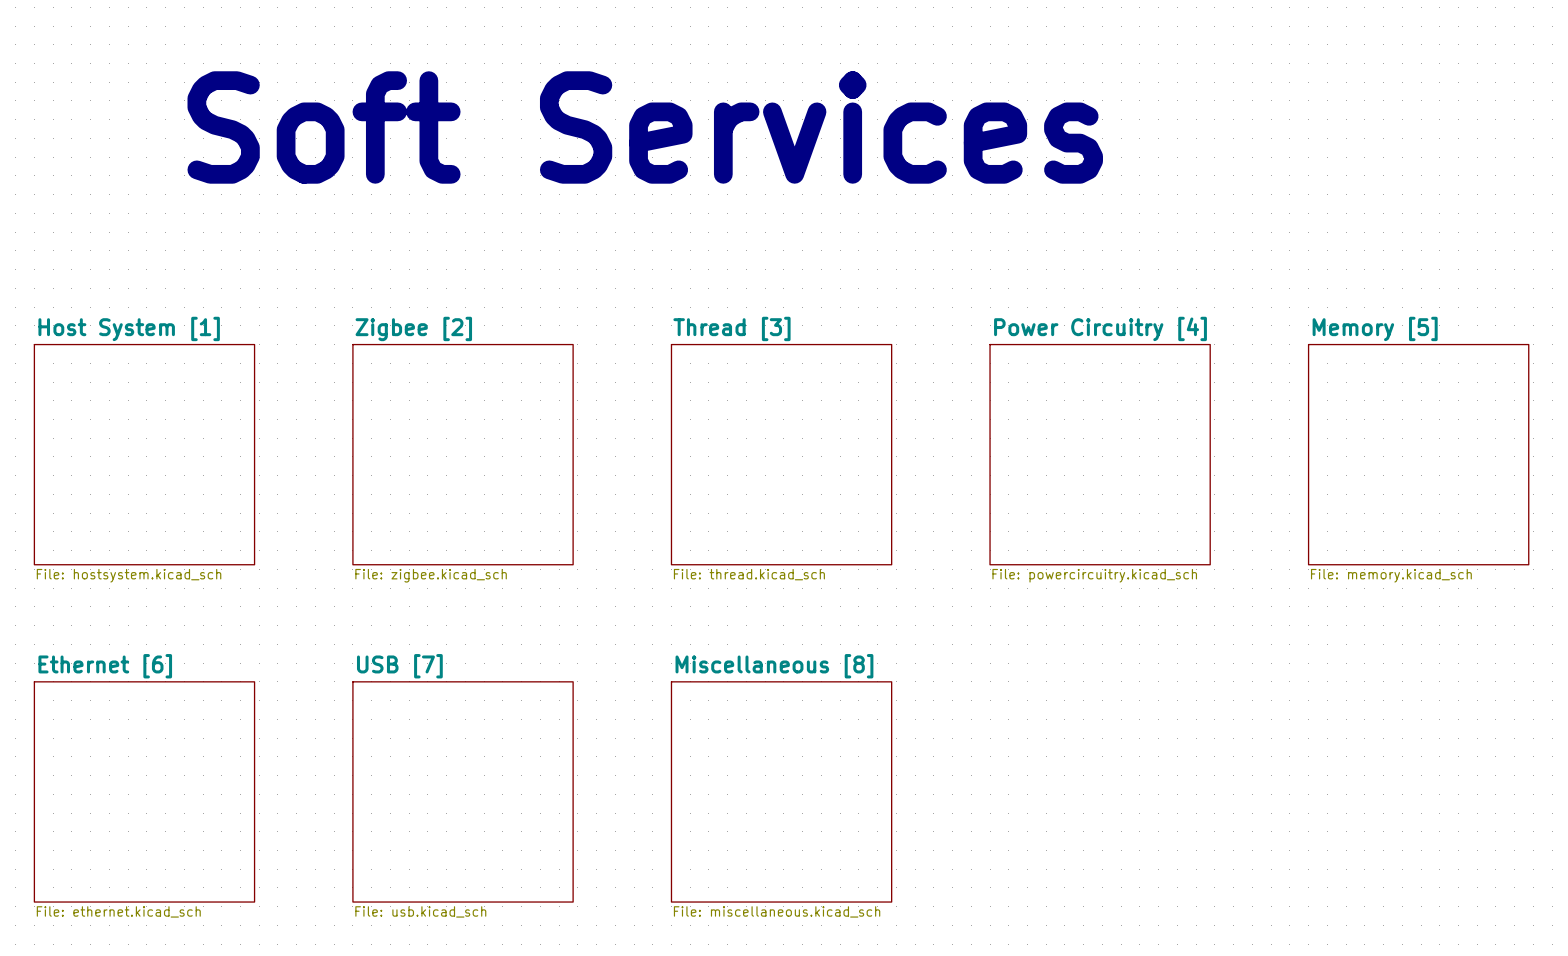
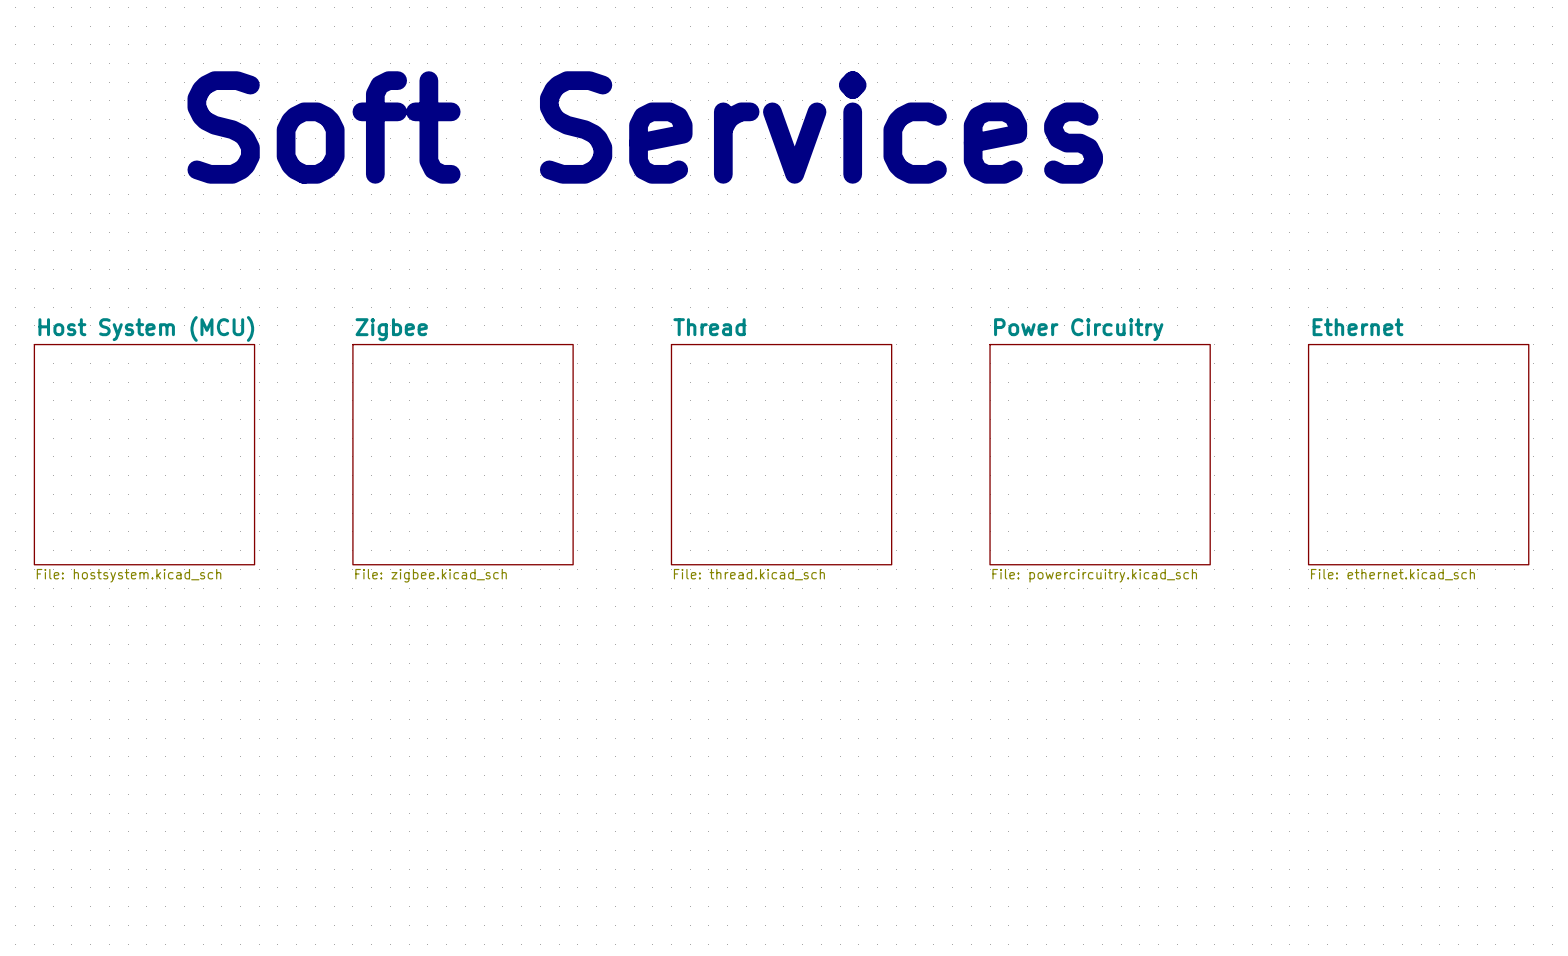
sheet Host System [1] name: Host System [1] (129, 328) -> Host System (MCU) (146, 328)
sheet Zigbee [2] name: Zigbee [2] (413, 328) -> Zigbee (391, 329)
sheet Thread [3] name: Thread [3] (731, 328) -> Thread (709, 327)
sheet Power Circuitry [4] name: Power Circuitry [4] (1100, 328) -> Power Circuitry (1078, 329)
sheet Memory [5] name: Memory [5] (1375, 328) -> Ethernet (1358, 327)
sheet Memory [5] value: File: memory.kicad_sch (1391, 575) -> File: ethernet.kicad_sch (1392, 574)
sheet Ethernet [6]: File: ethernet.kicad_sch (144, 791) -> none
sheet USB [7]: File: usb.kicad_sch (463, 791) -> none
sheet Miscellaneous [8]: File: miscellaneous.kicad_sch (781, 791) -> none

